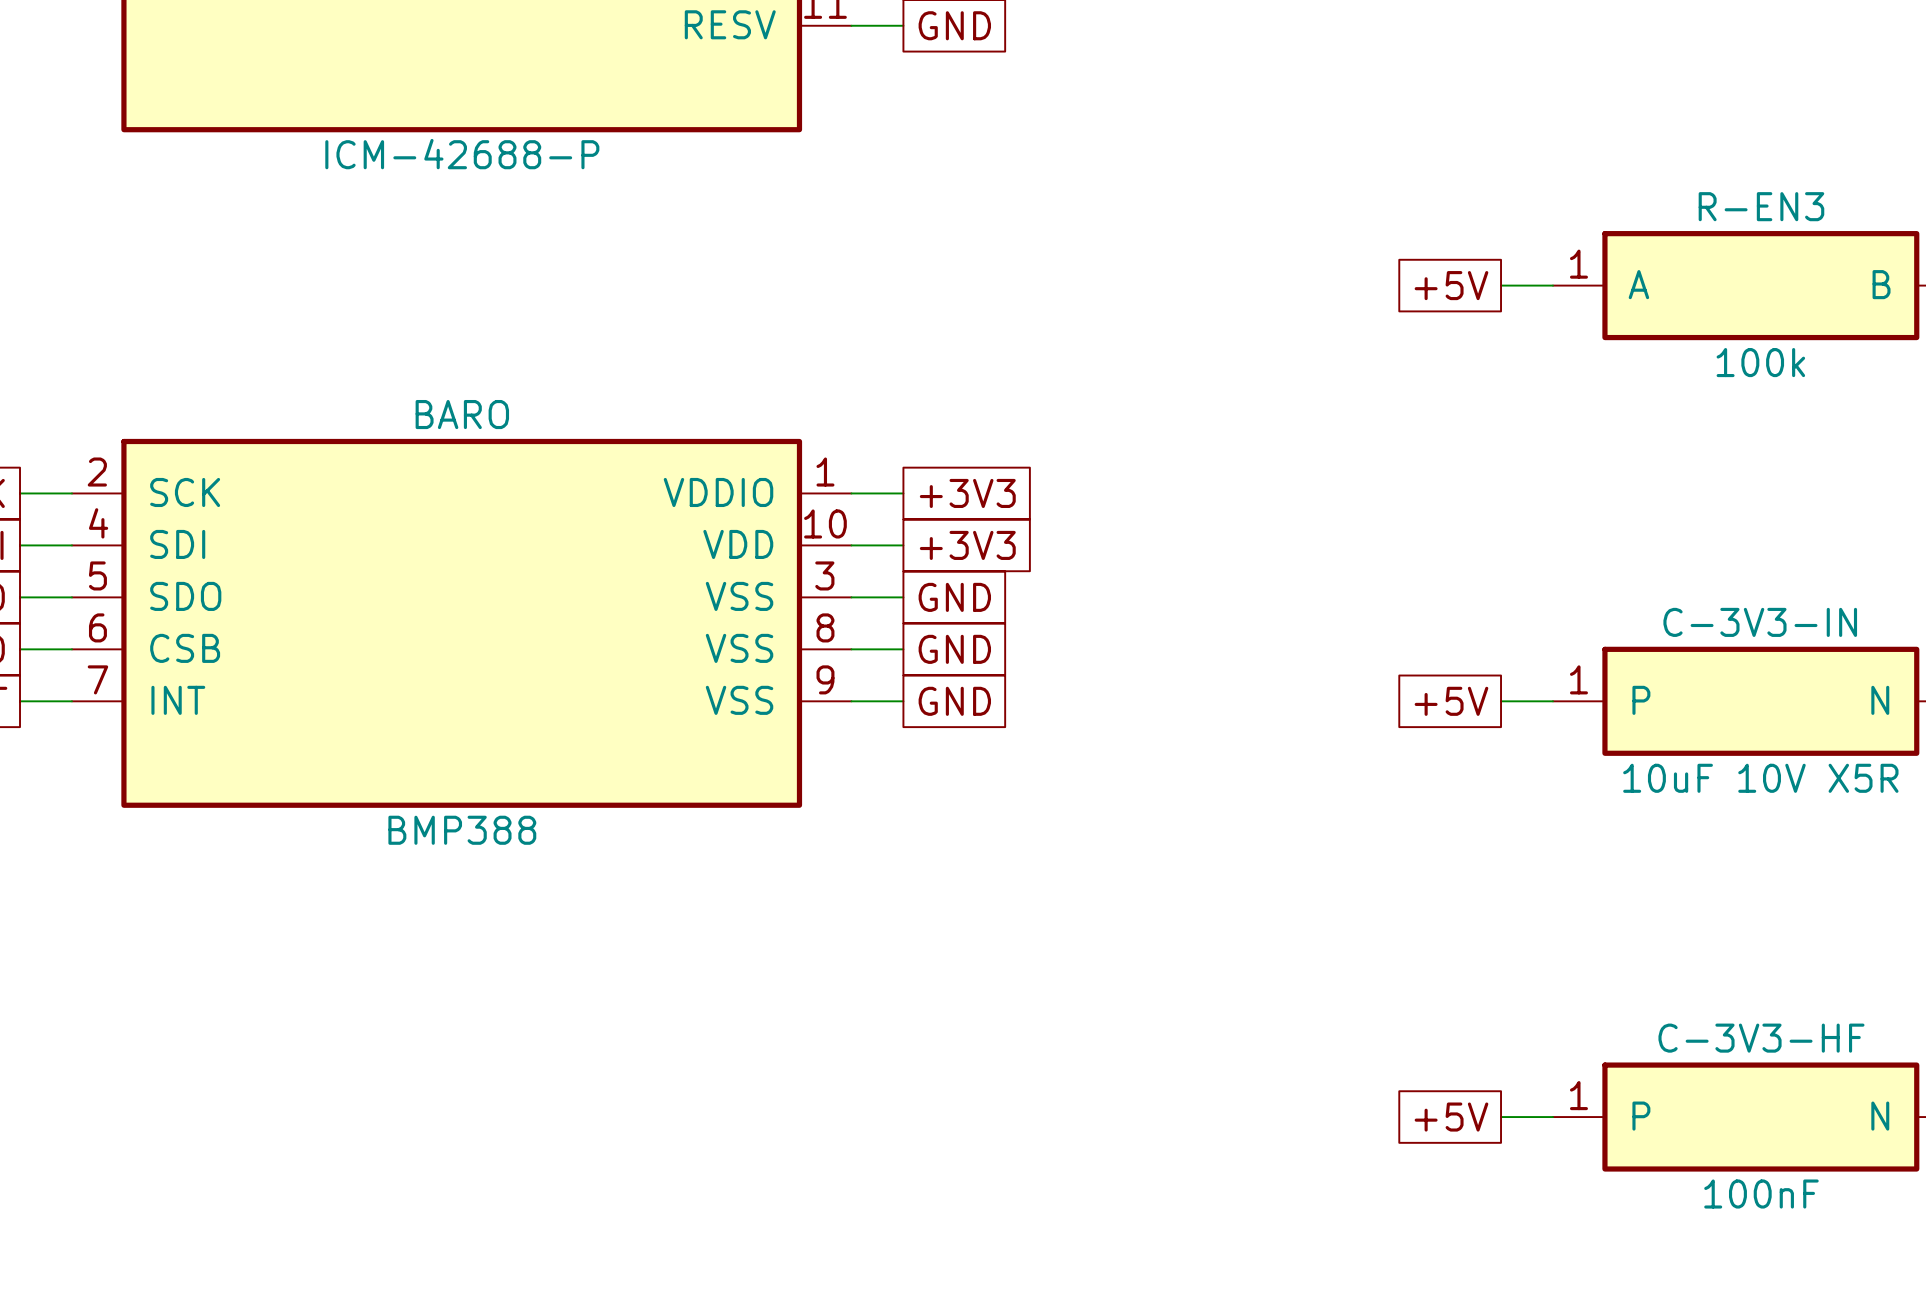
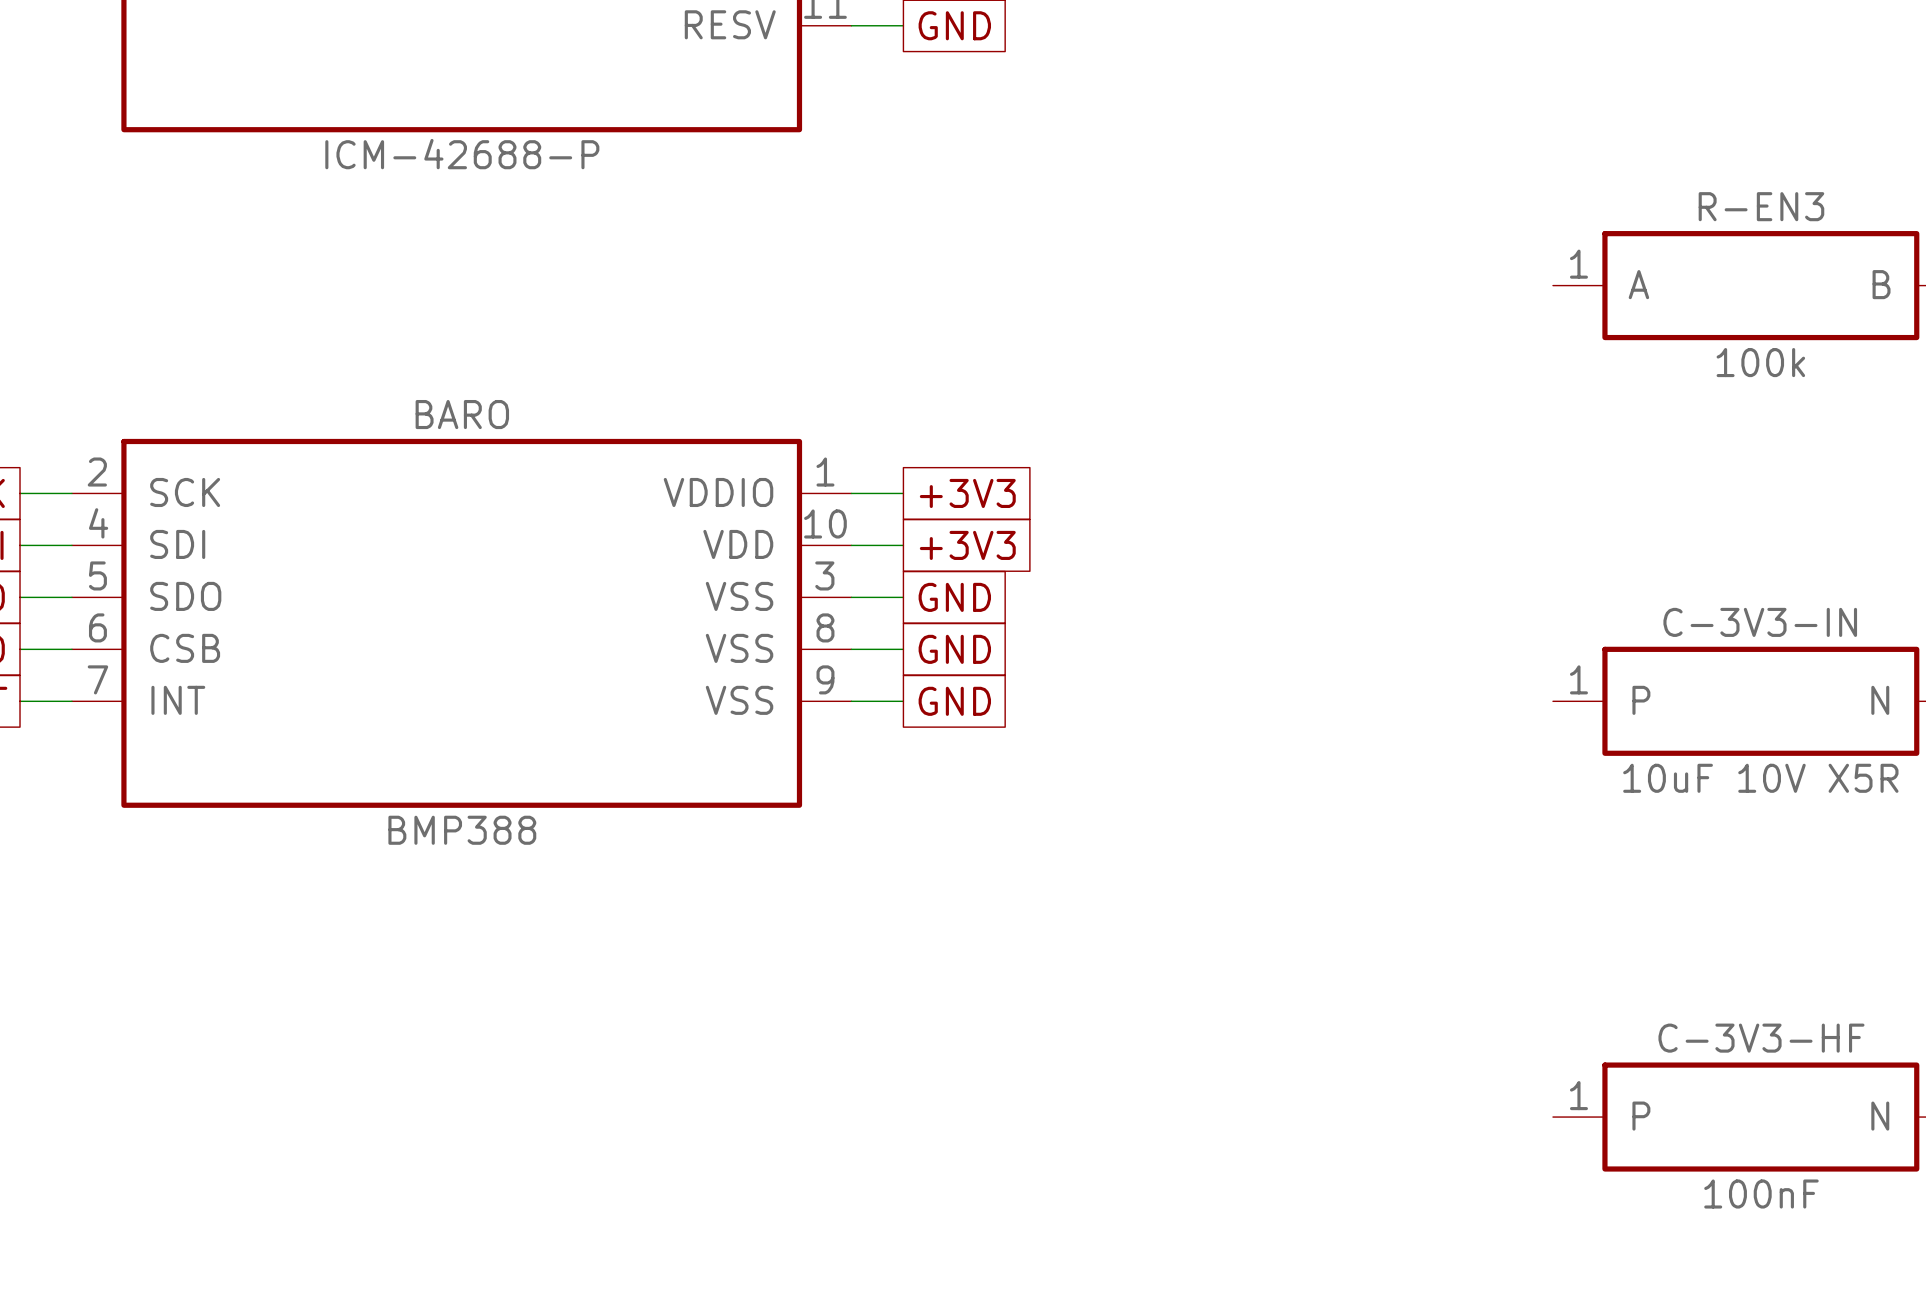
global label: +5V (1451, 285) -> none
wire: (1501, 285) (1552, 285) -> none
global label: +5V (1451, 701) -> none
wire: (1501, 701) (1552, 701) -> none
global label: +5V (1451, 1117) -> none
wire: (1501, 1117) (1552, 1117) -> none

